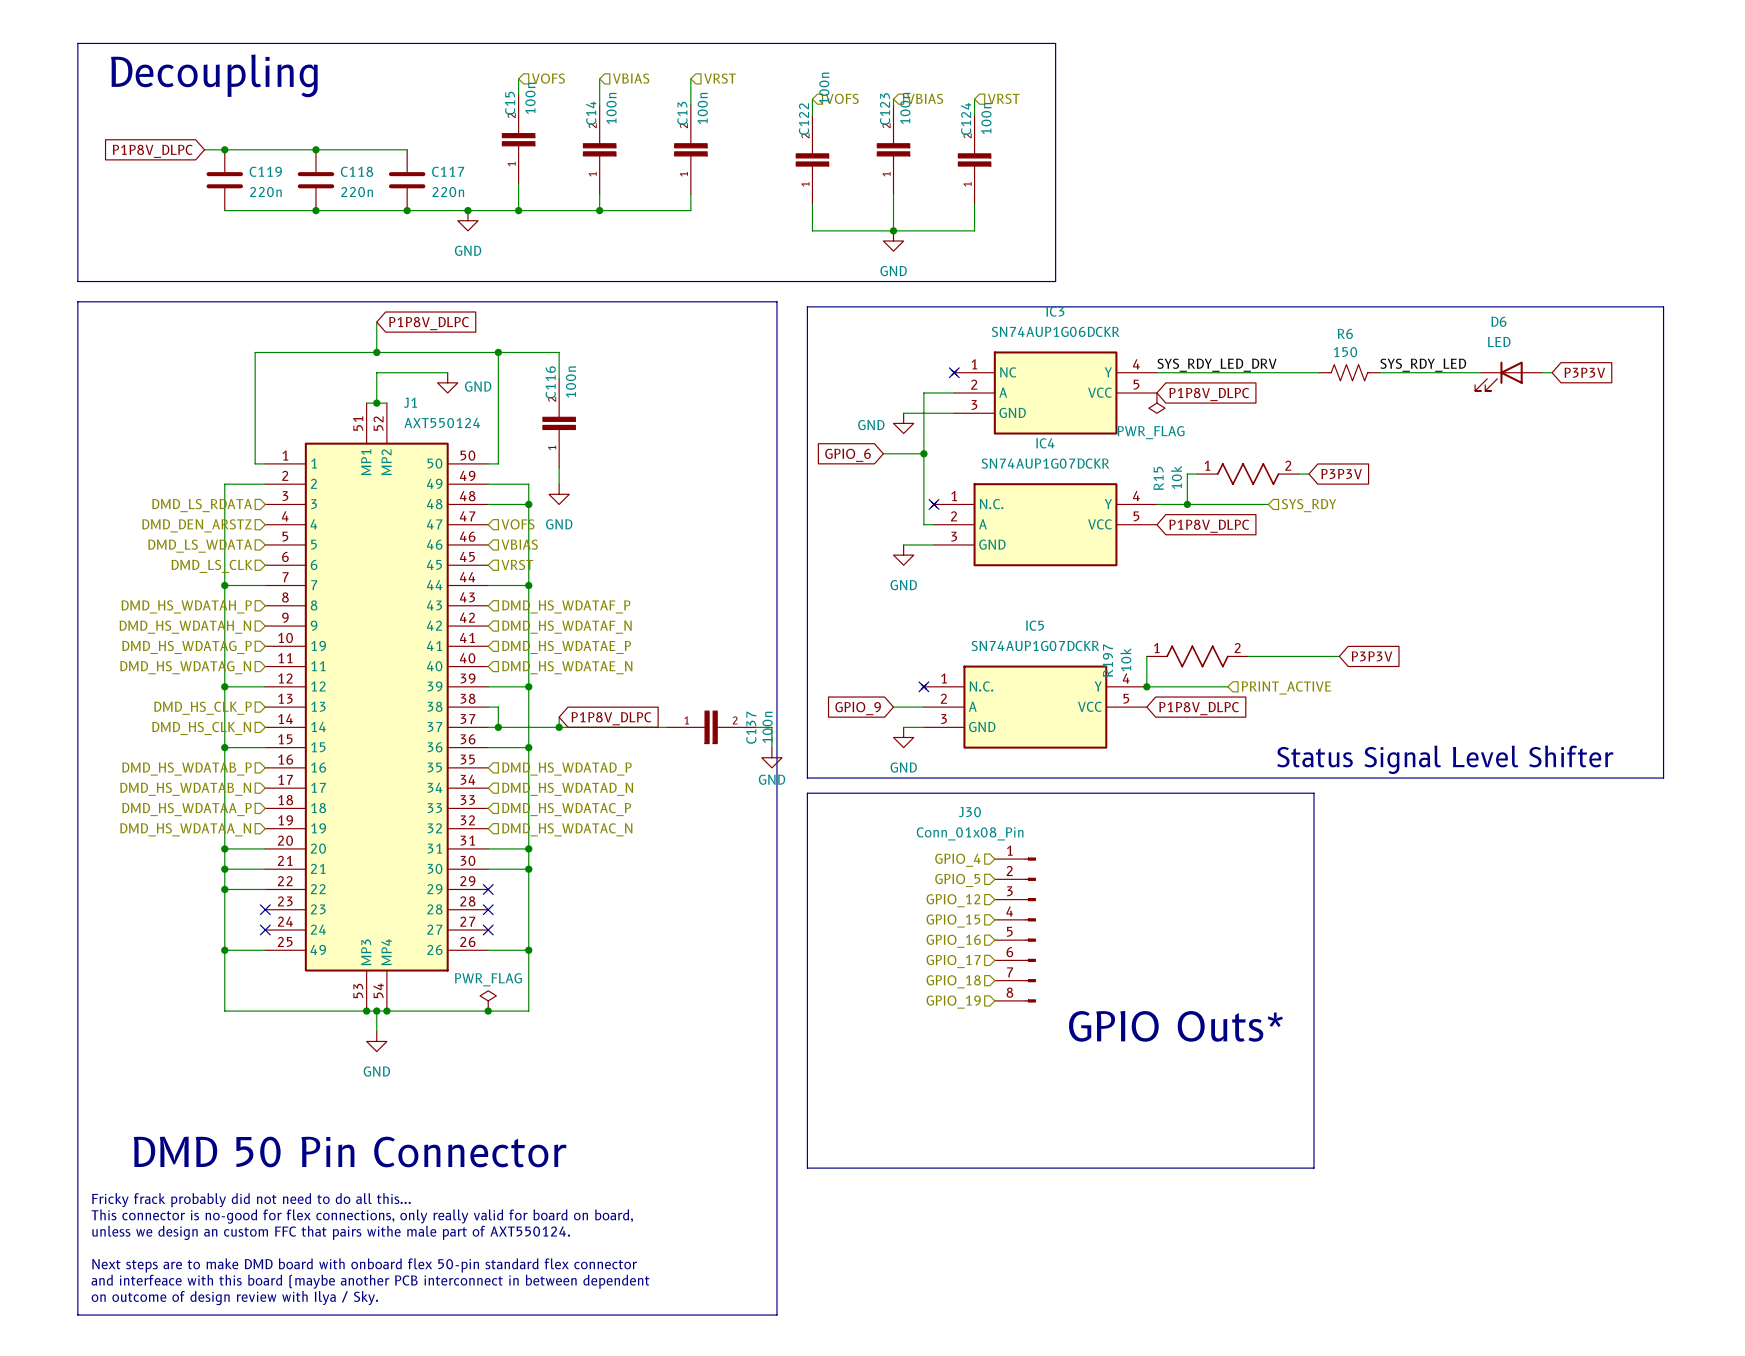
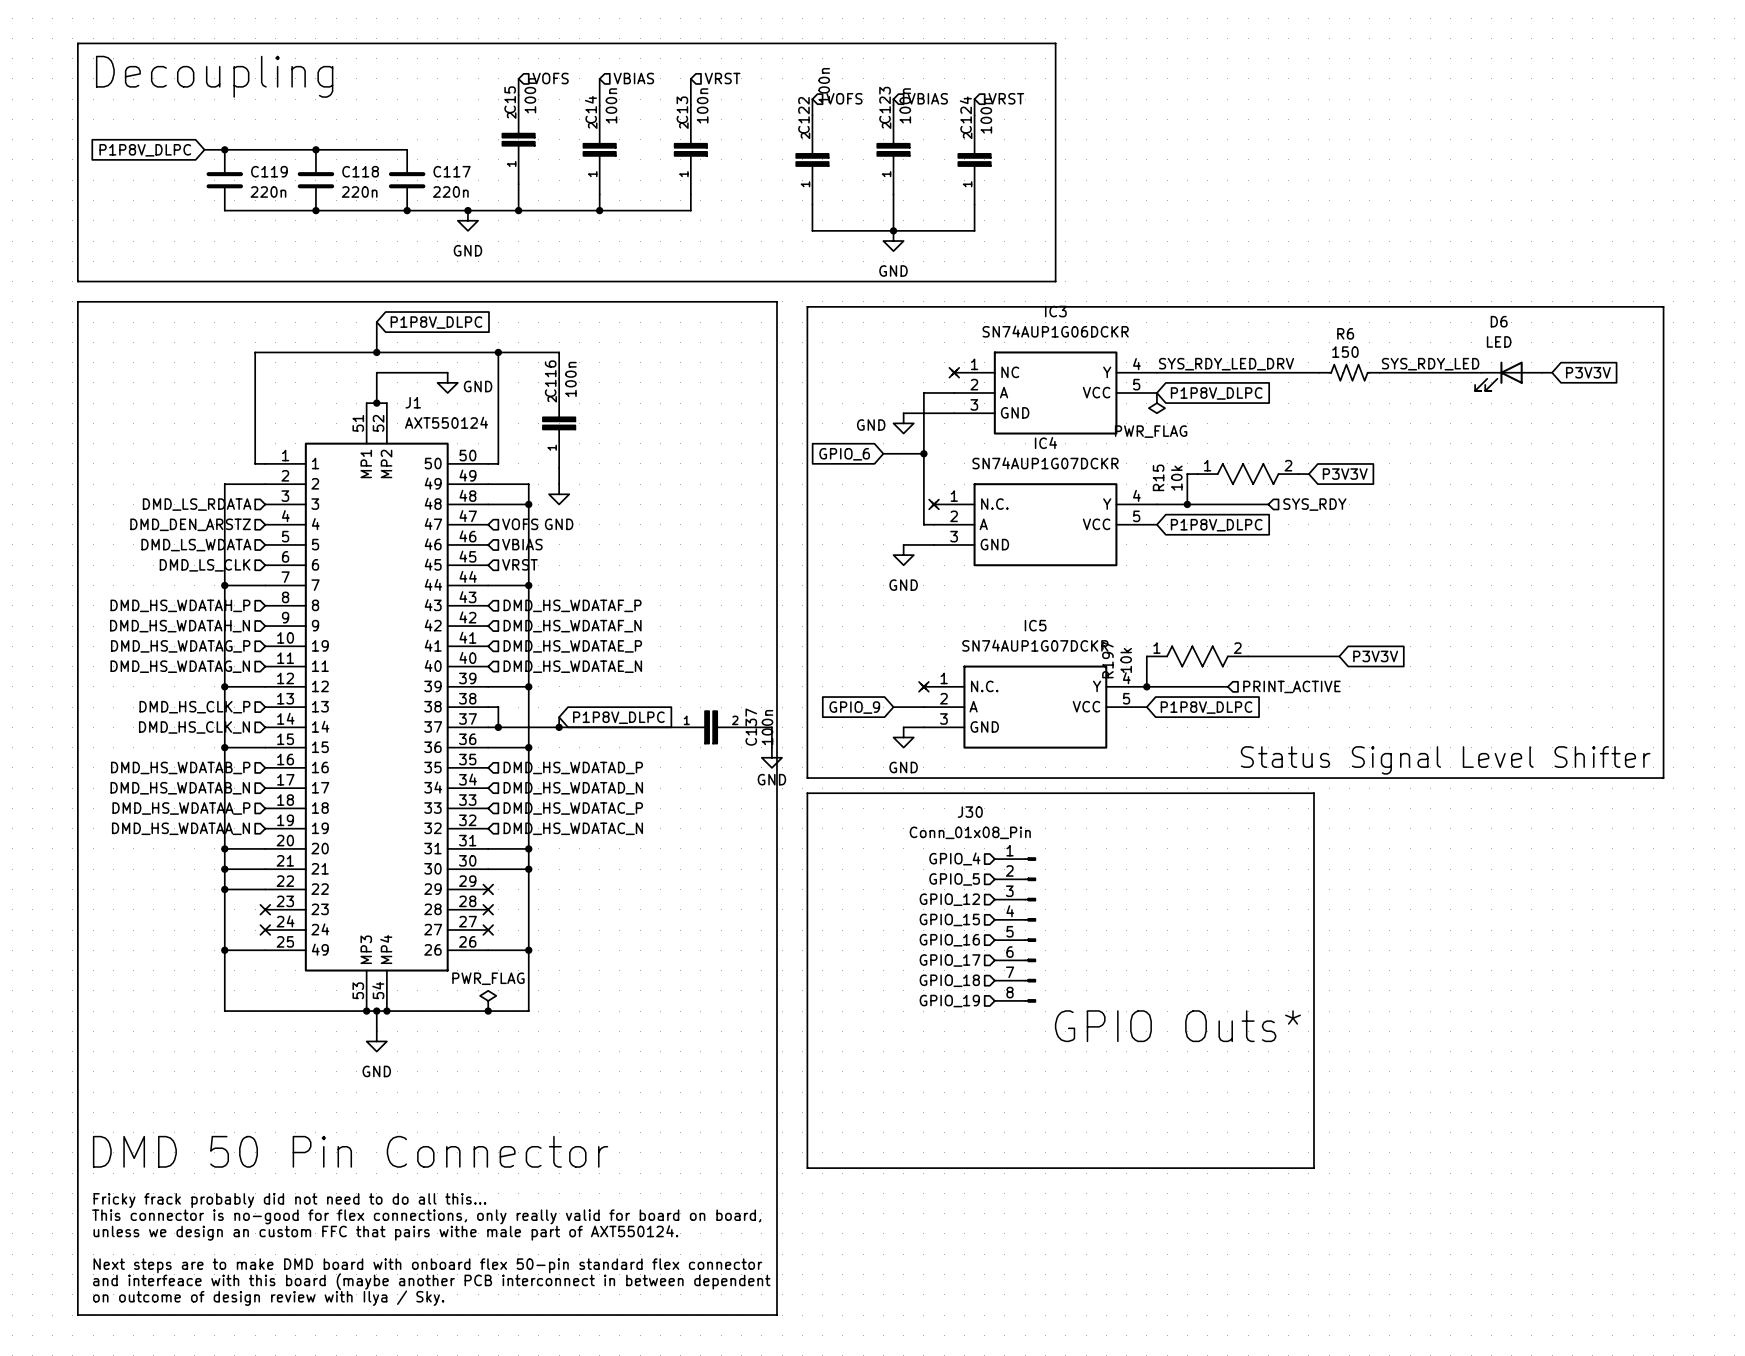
global label: P3P3V (1584, 372) -> P3V3V (1588, 372)
global label: P3P3V (1341, 474) -> P3V3V (1345, 474)
global label: P3P3V (1372, 656) -> P3V3V (1375, 656)

